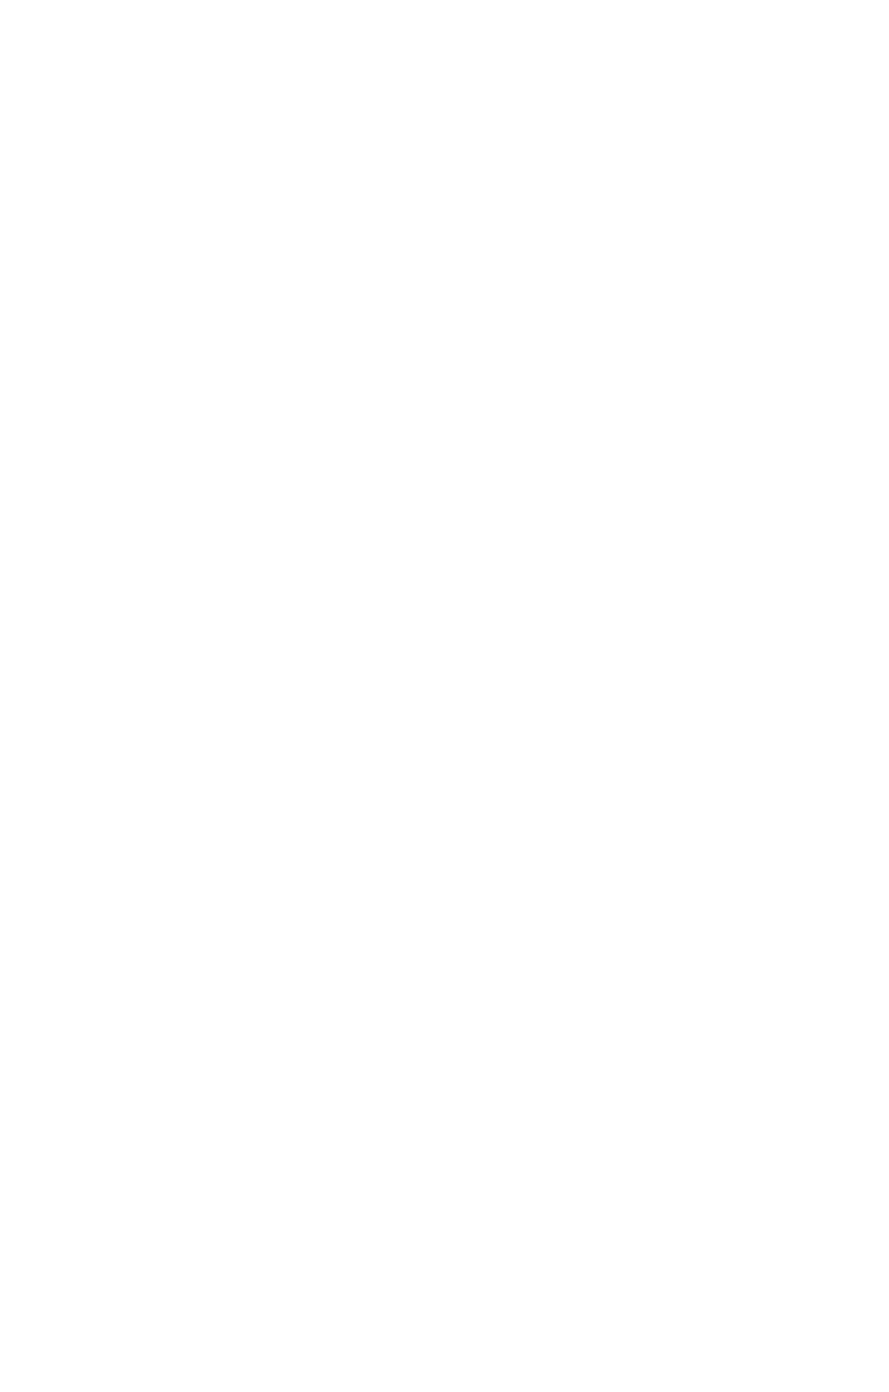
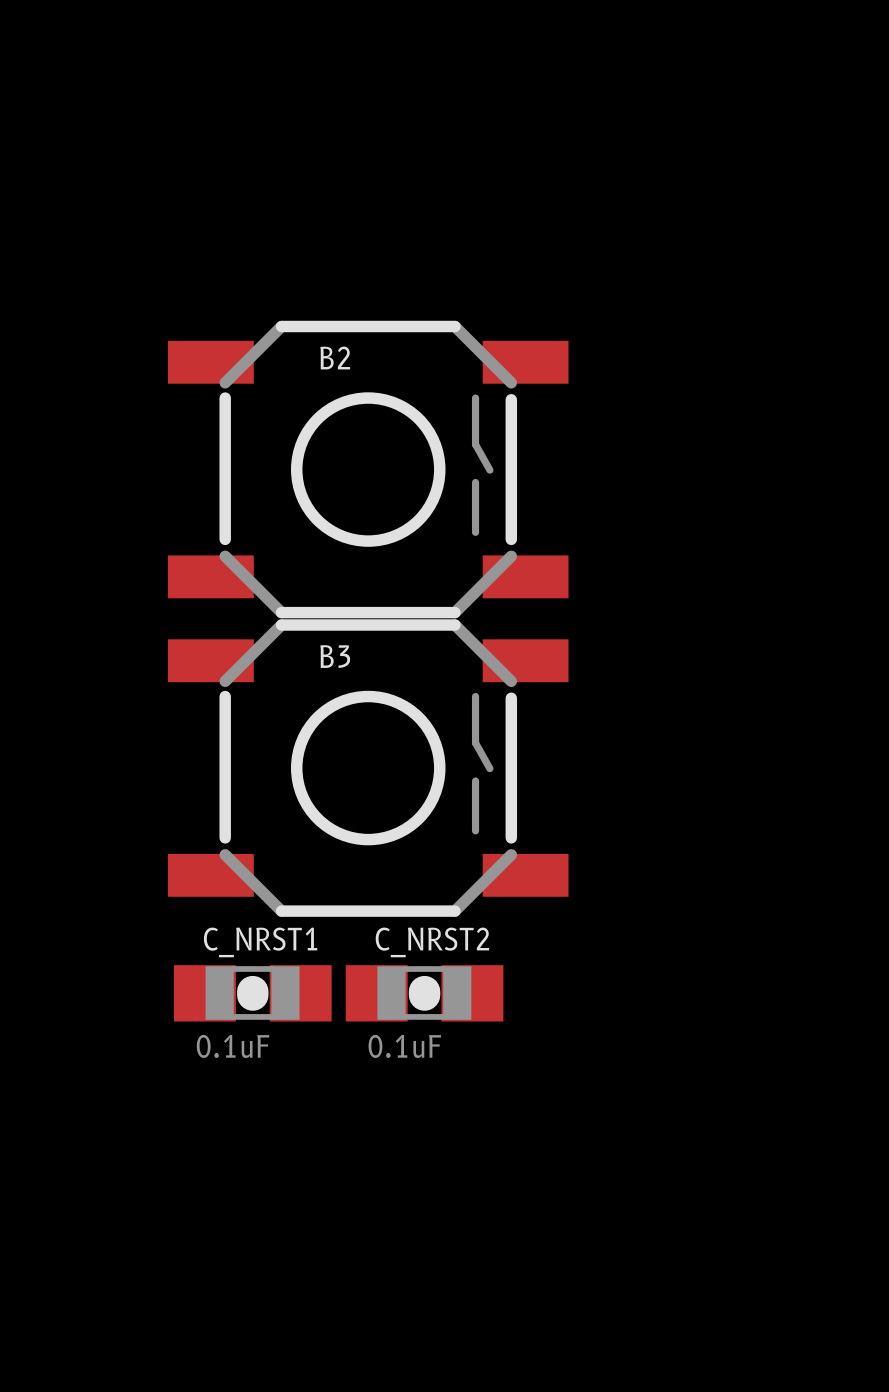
B2: none -> (368, 469)
B3: none -> (368, 768)
C_NRST1: none -> 0.1uF (252, 993)
C_NRST2: none -> 0.1uF (424, 993)

